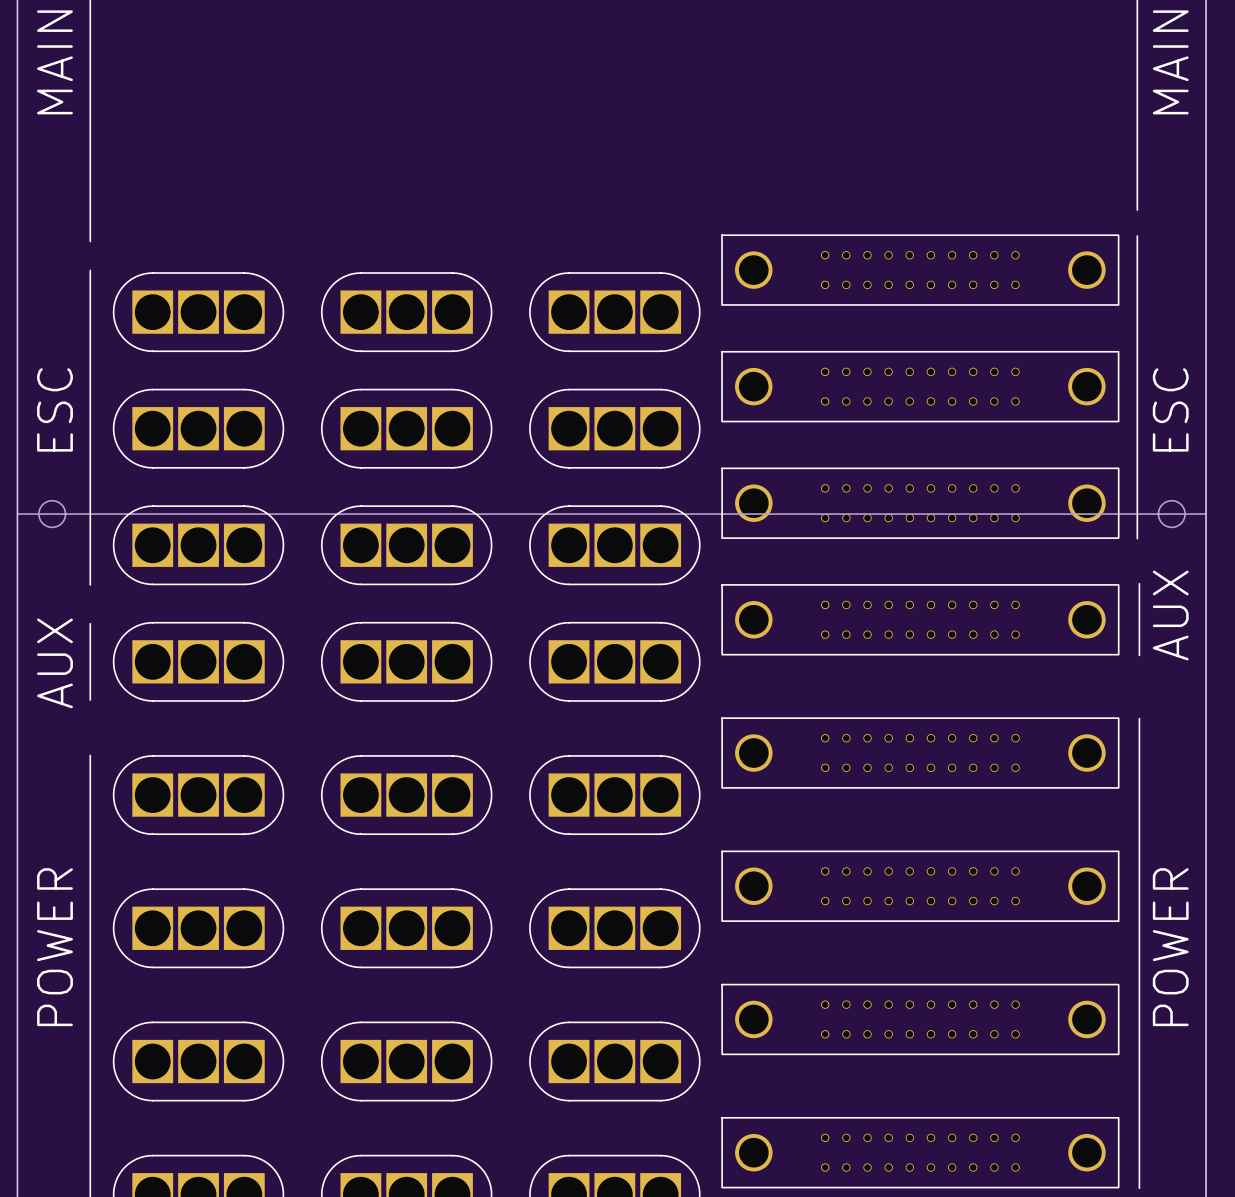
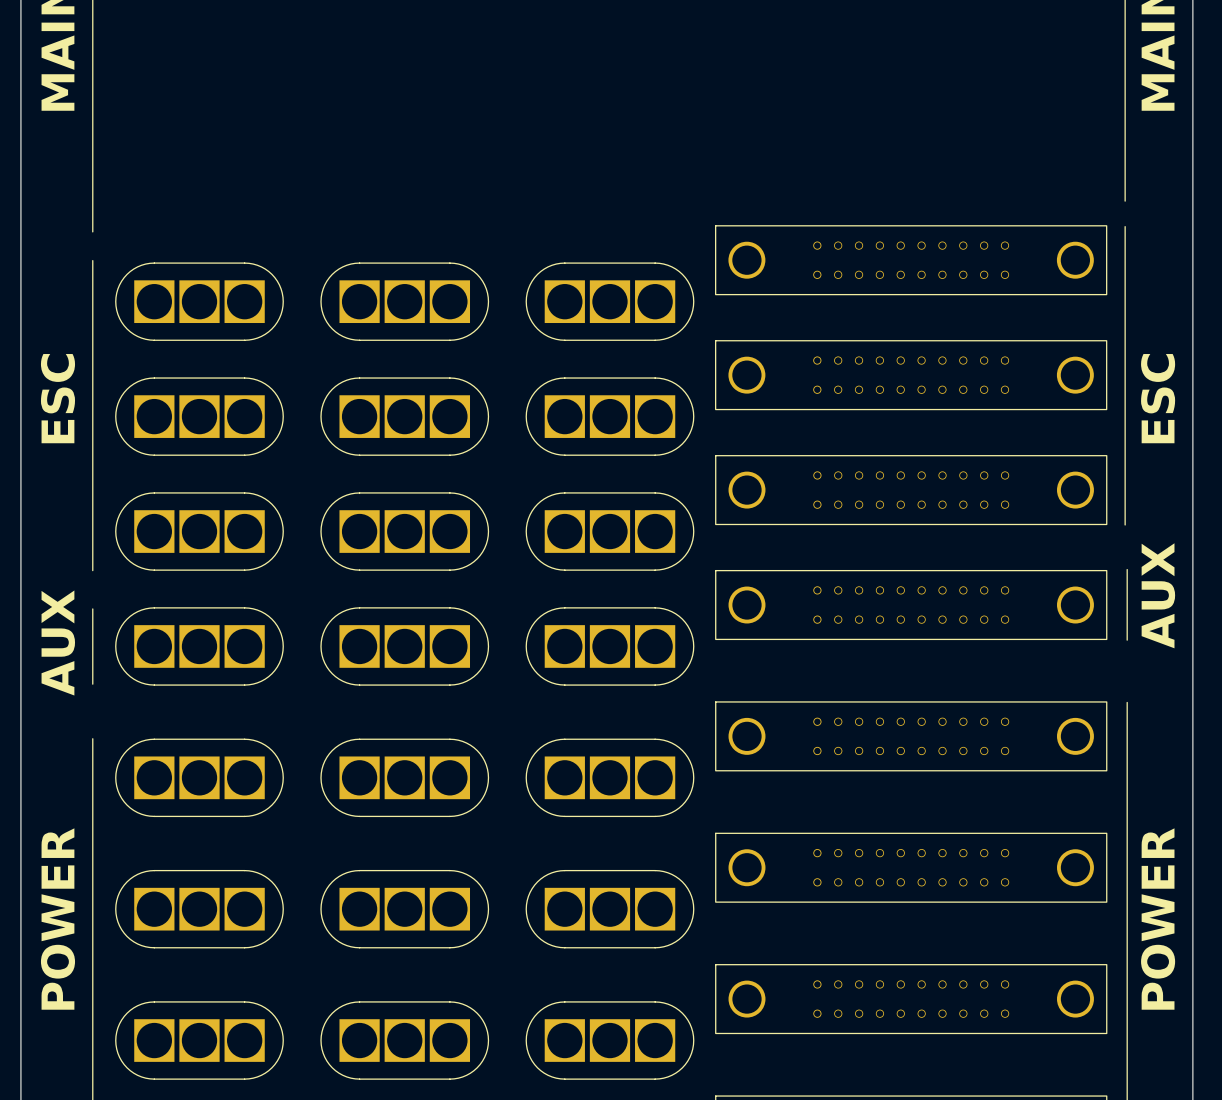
drawing: [38, 500, 67, 529] -> none
drawing: [1157, 500, 1186, 529] -> none
line: (17, 514) (1206, 514) -> none

